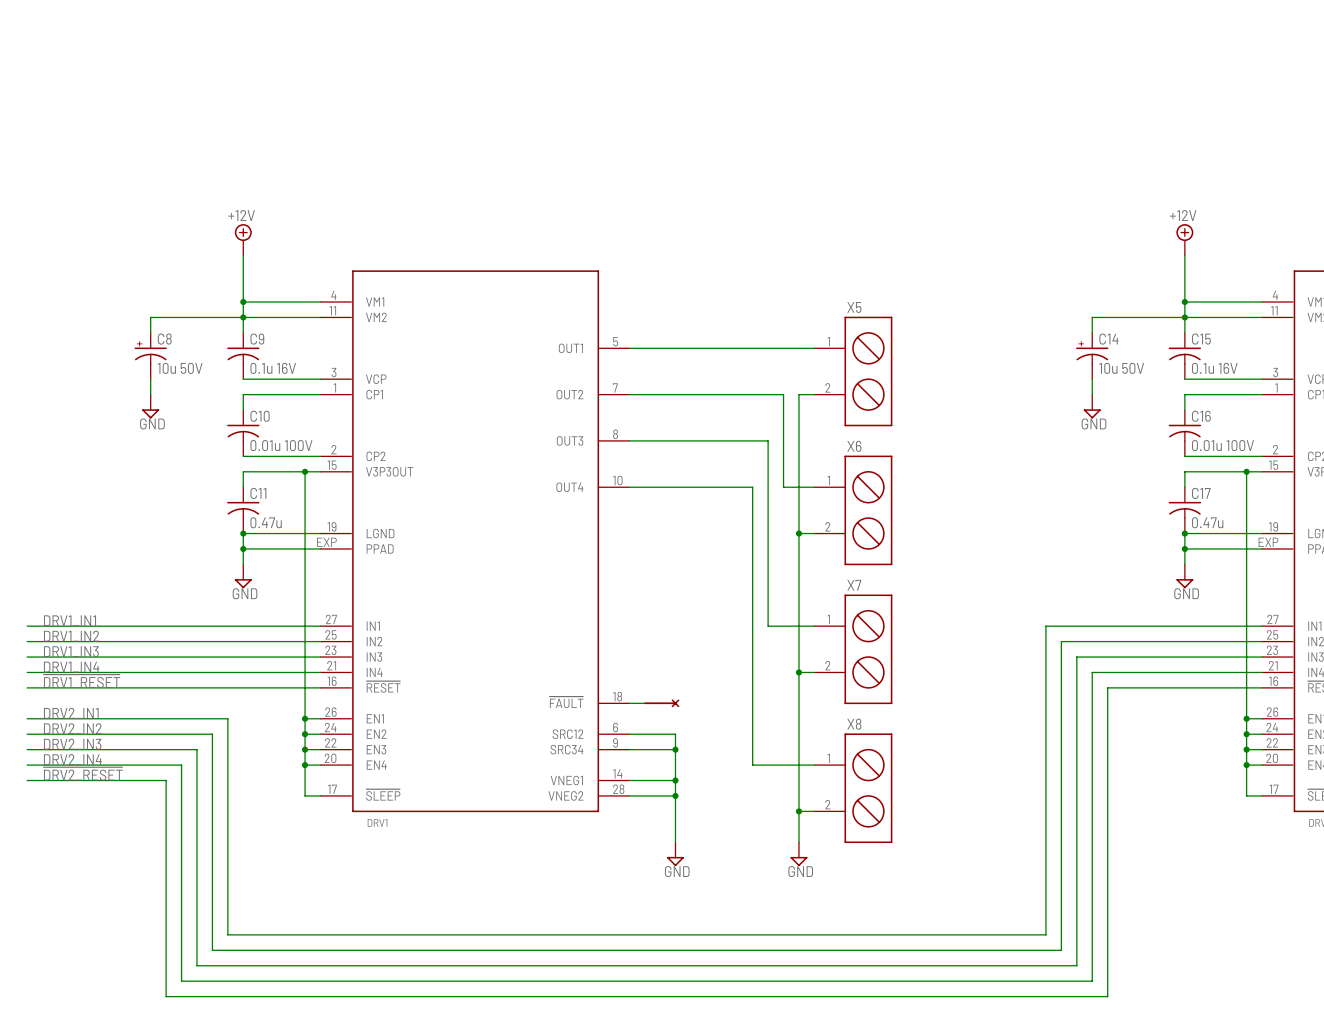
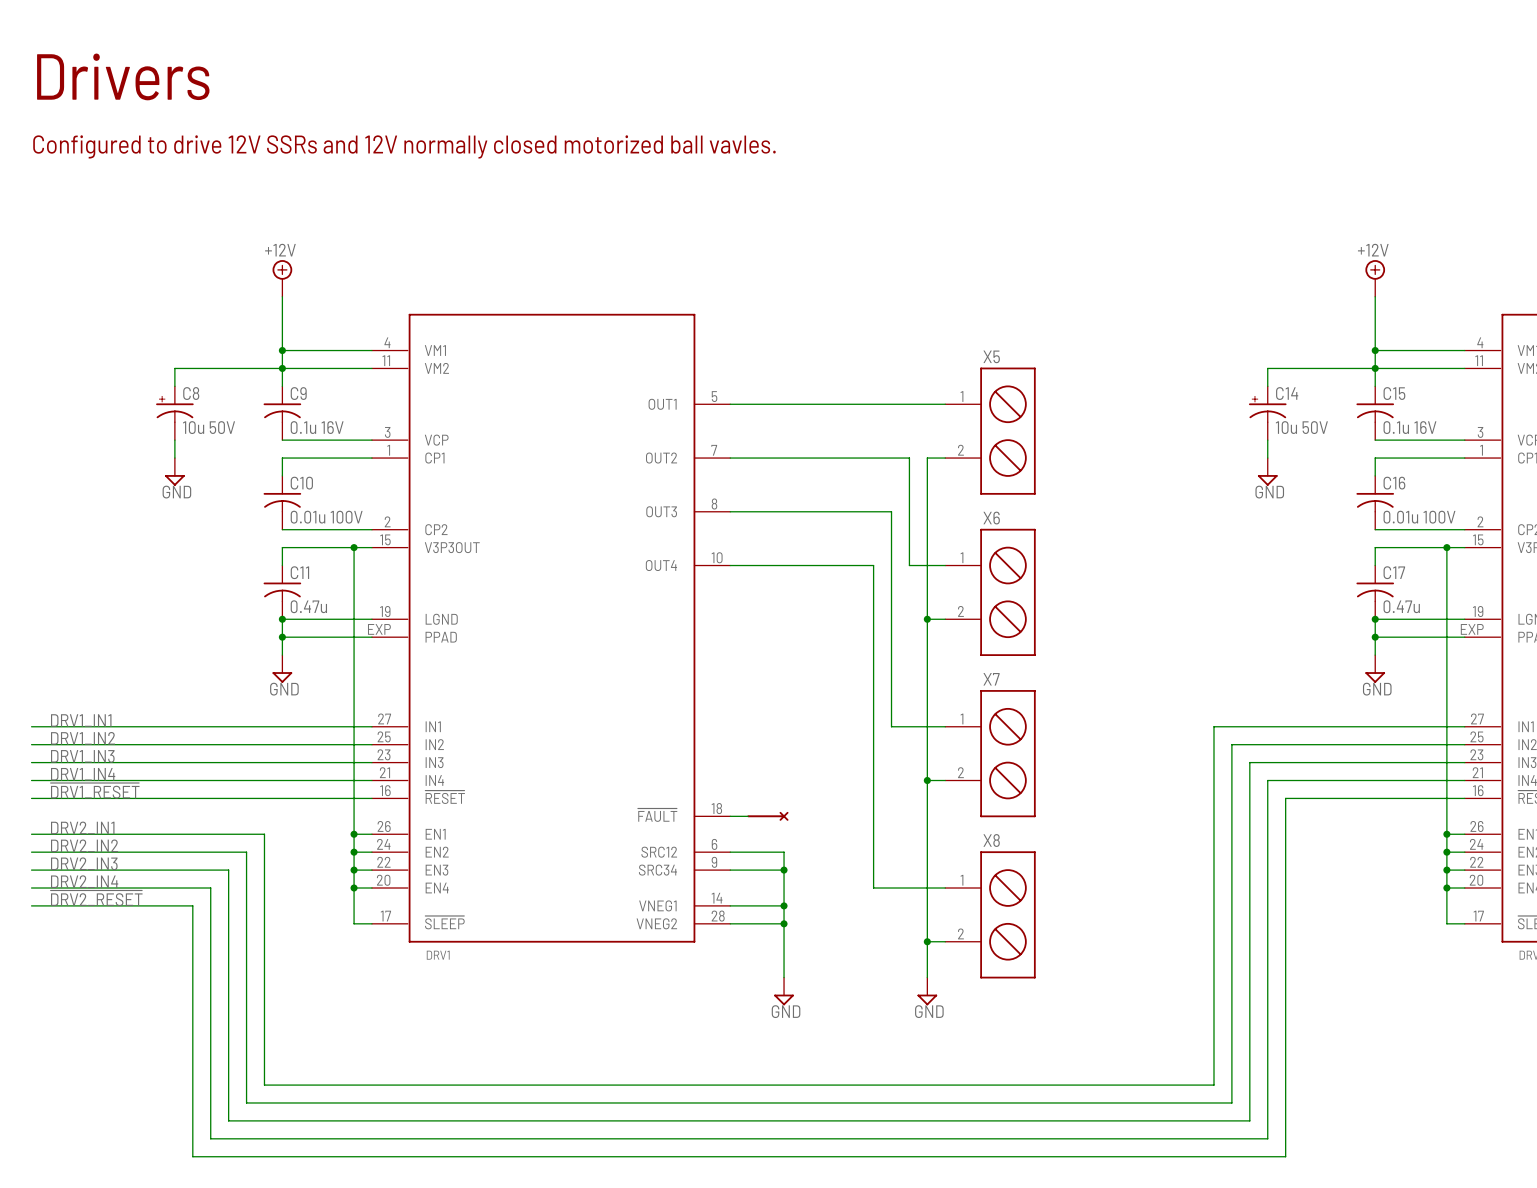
text: none -> Drivers (123, 76)
text: none -> Configured to drive 12V SSRs and 12V normally closed motorized ball vavles. (404, 146)

